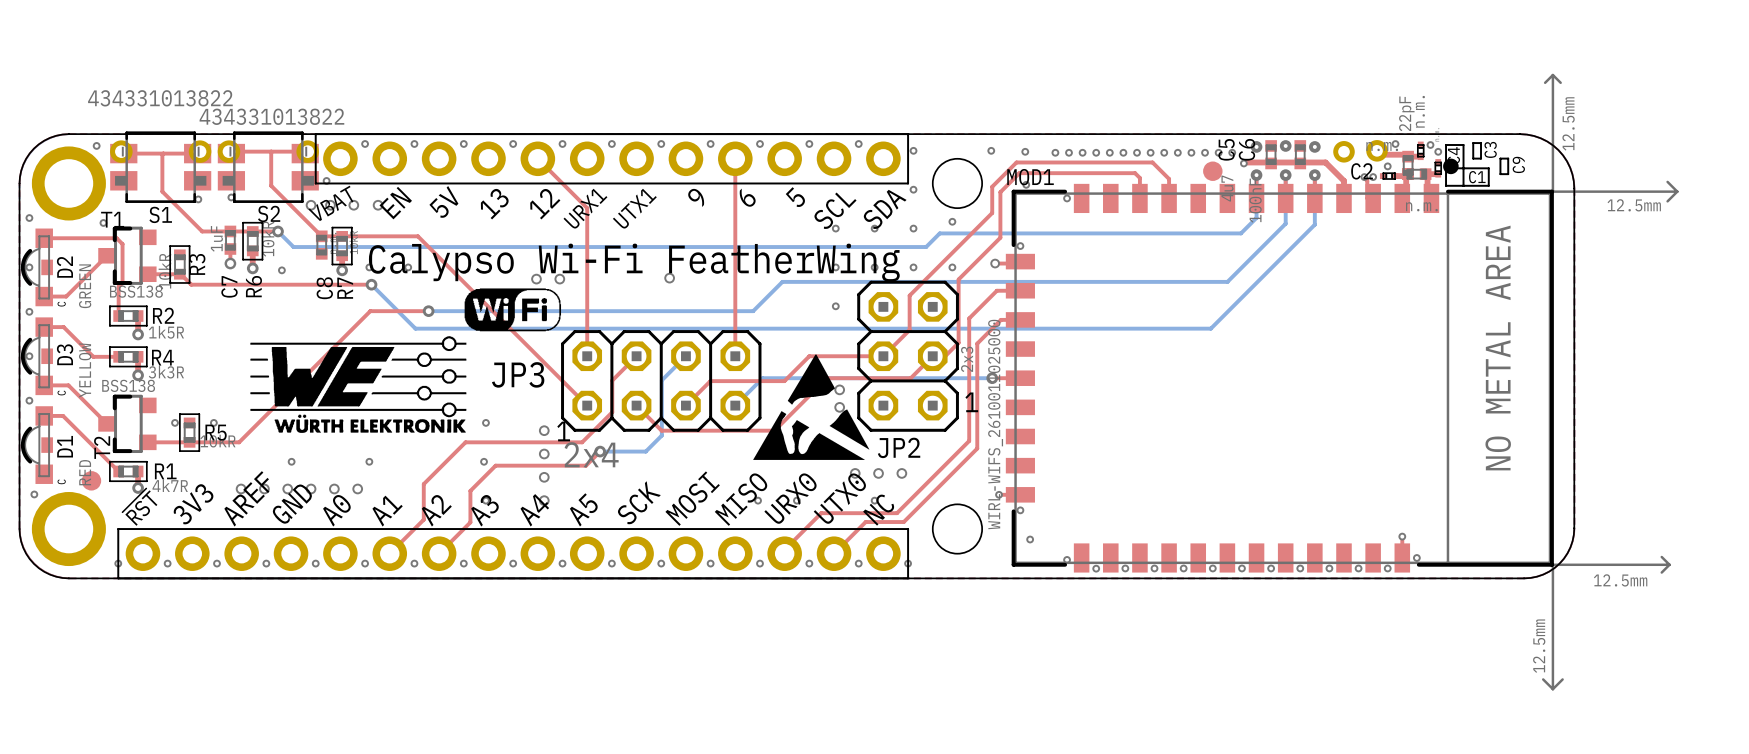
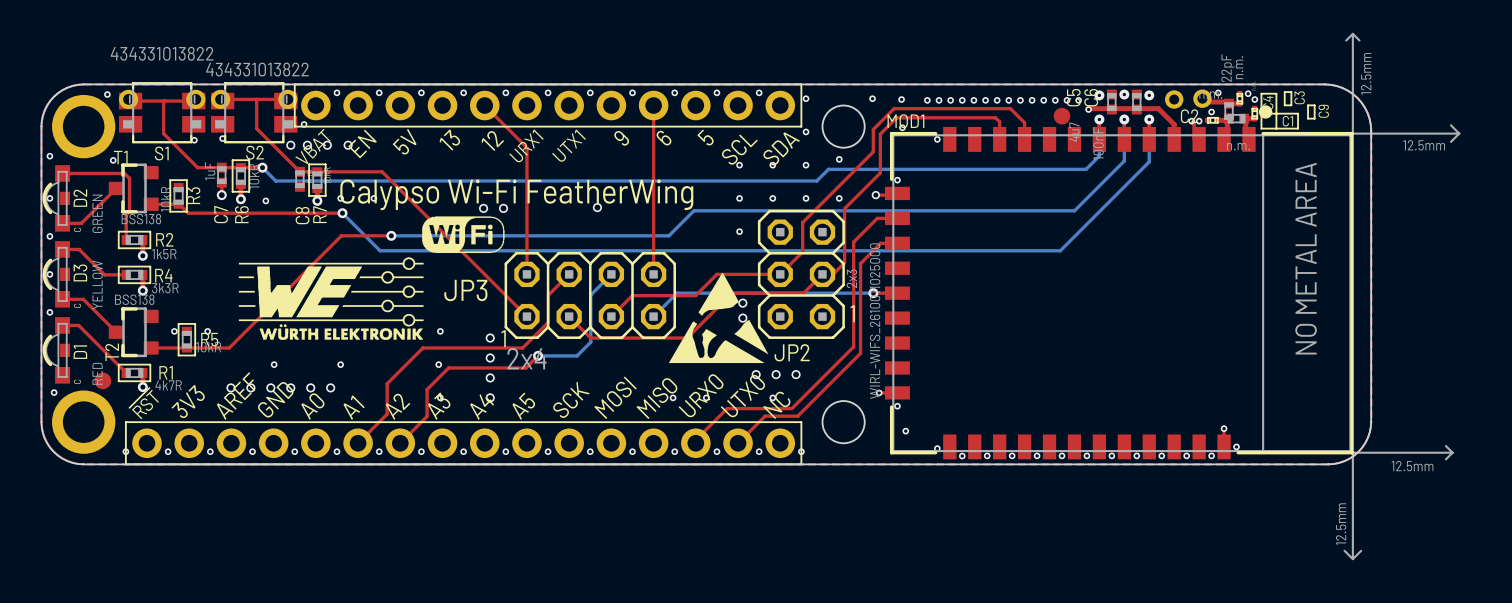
text rotation: 0° (330, 203) -> 15° counterclockwise (312, 146)

